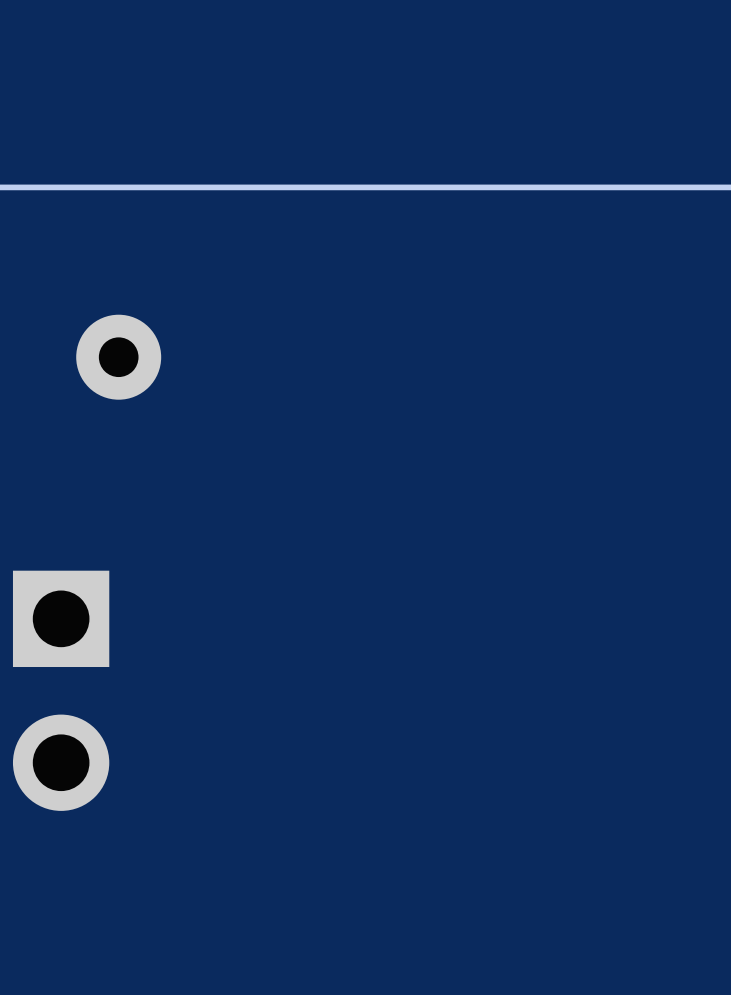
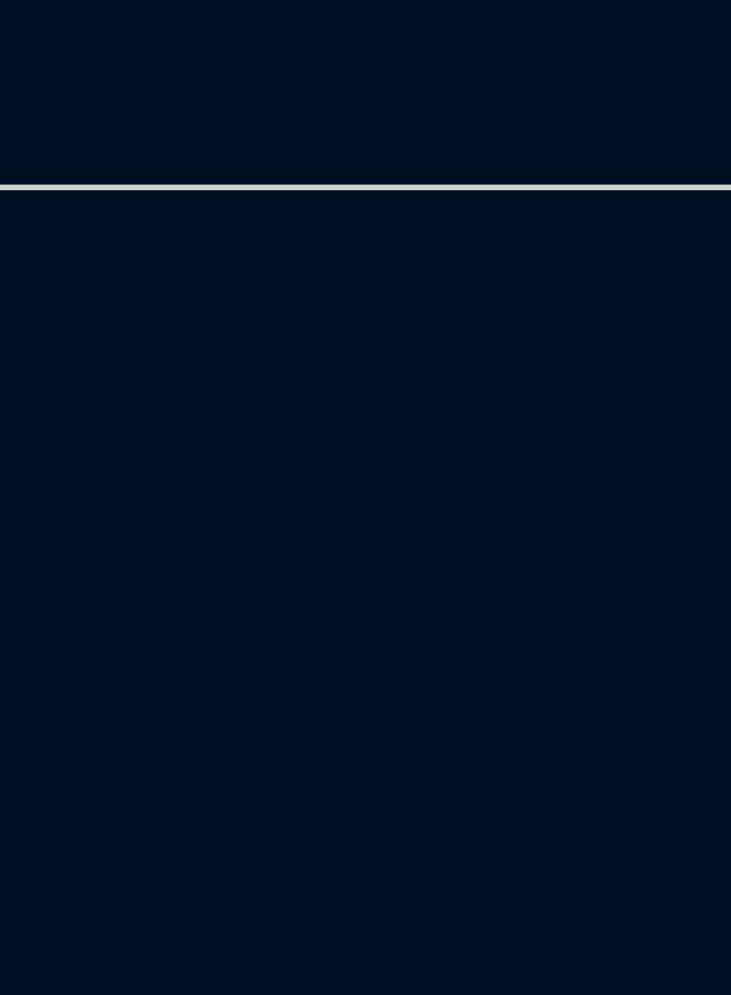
part: (118, 357) -> none
part: (61, 690) -> none

